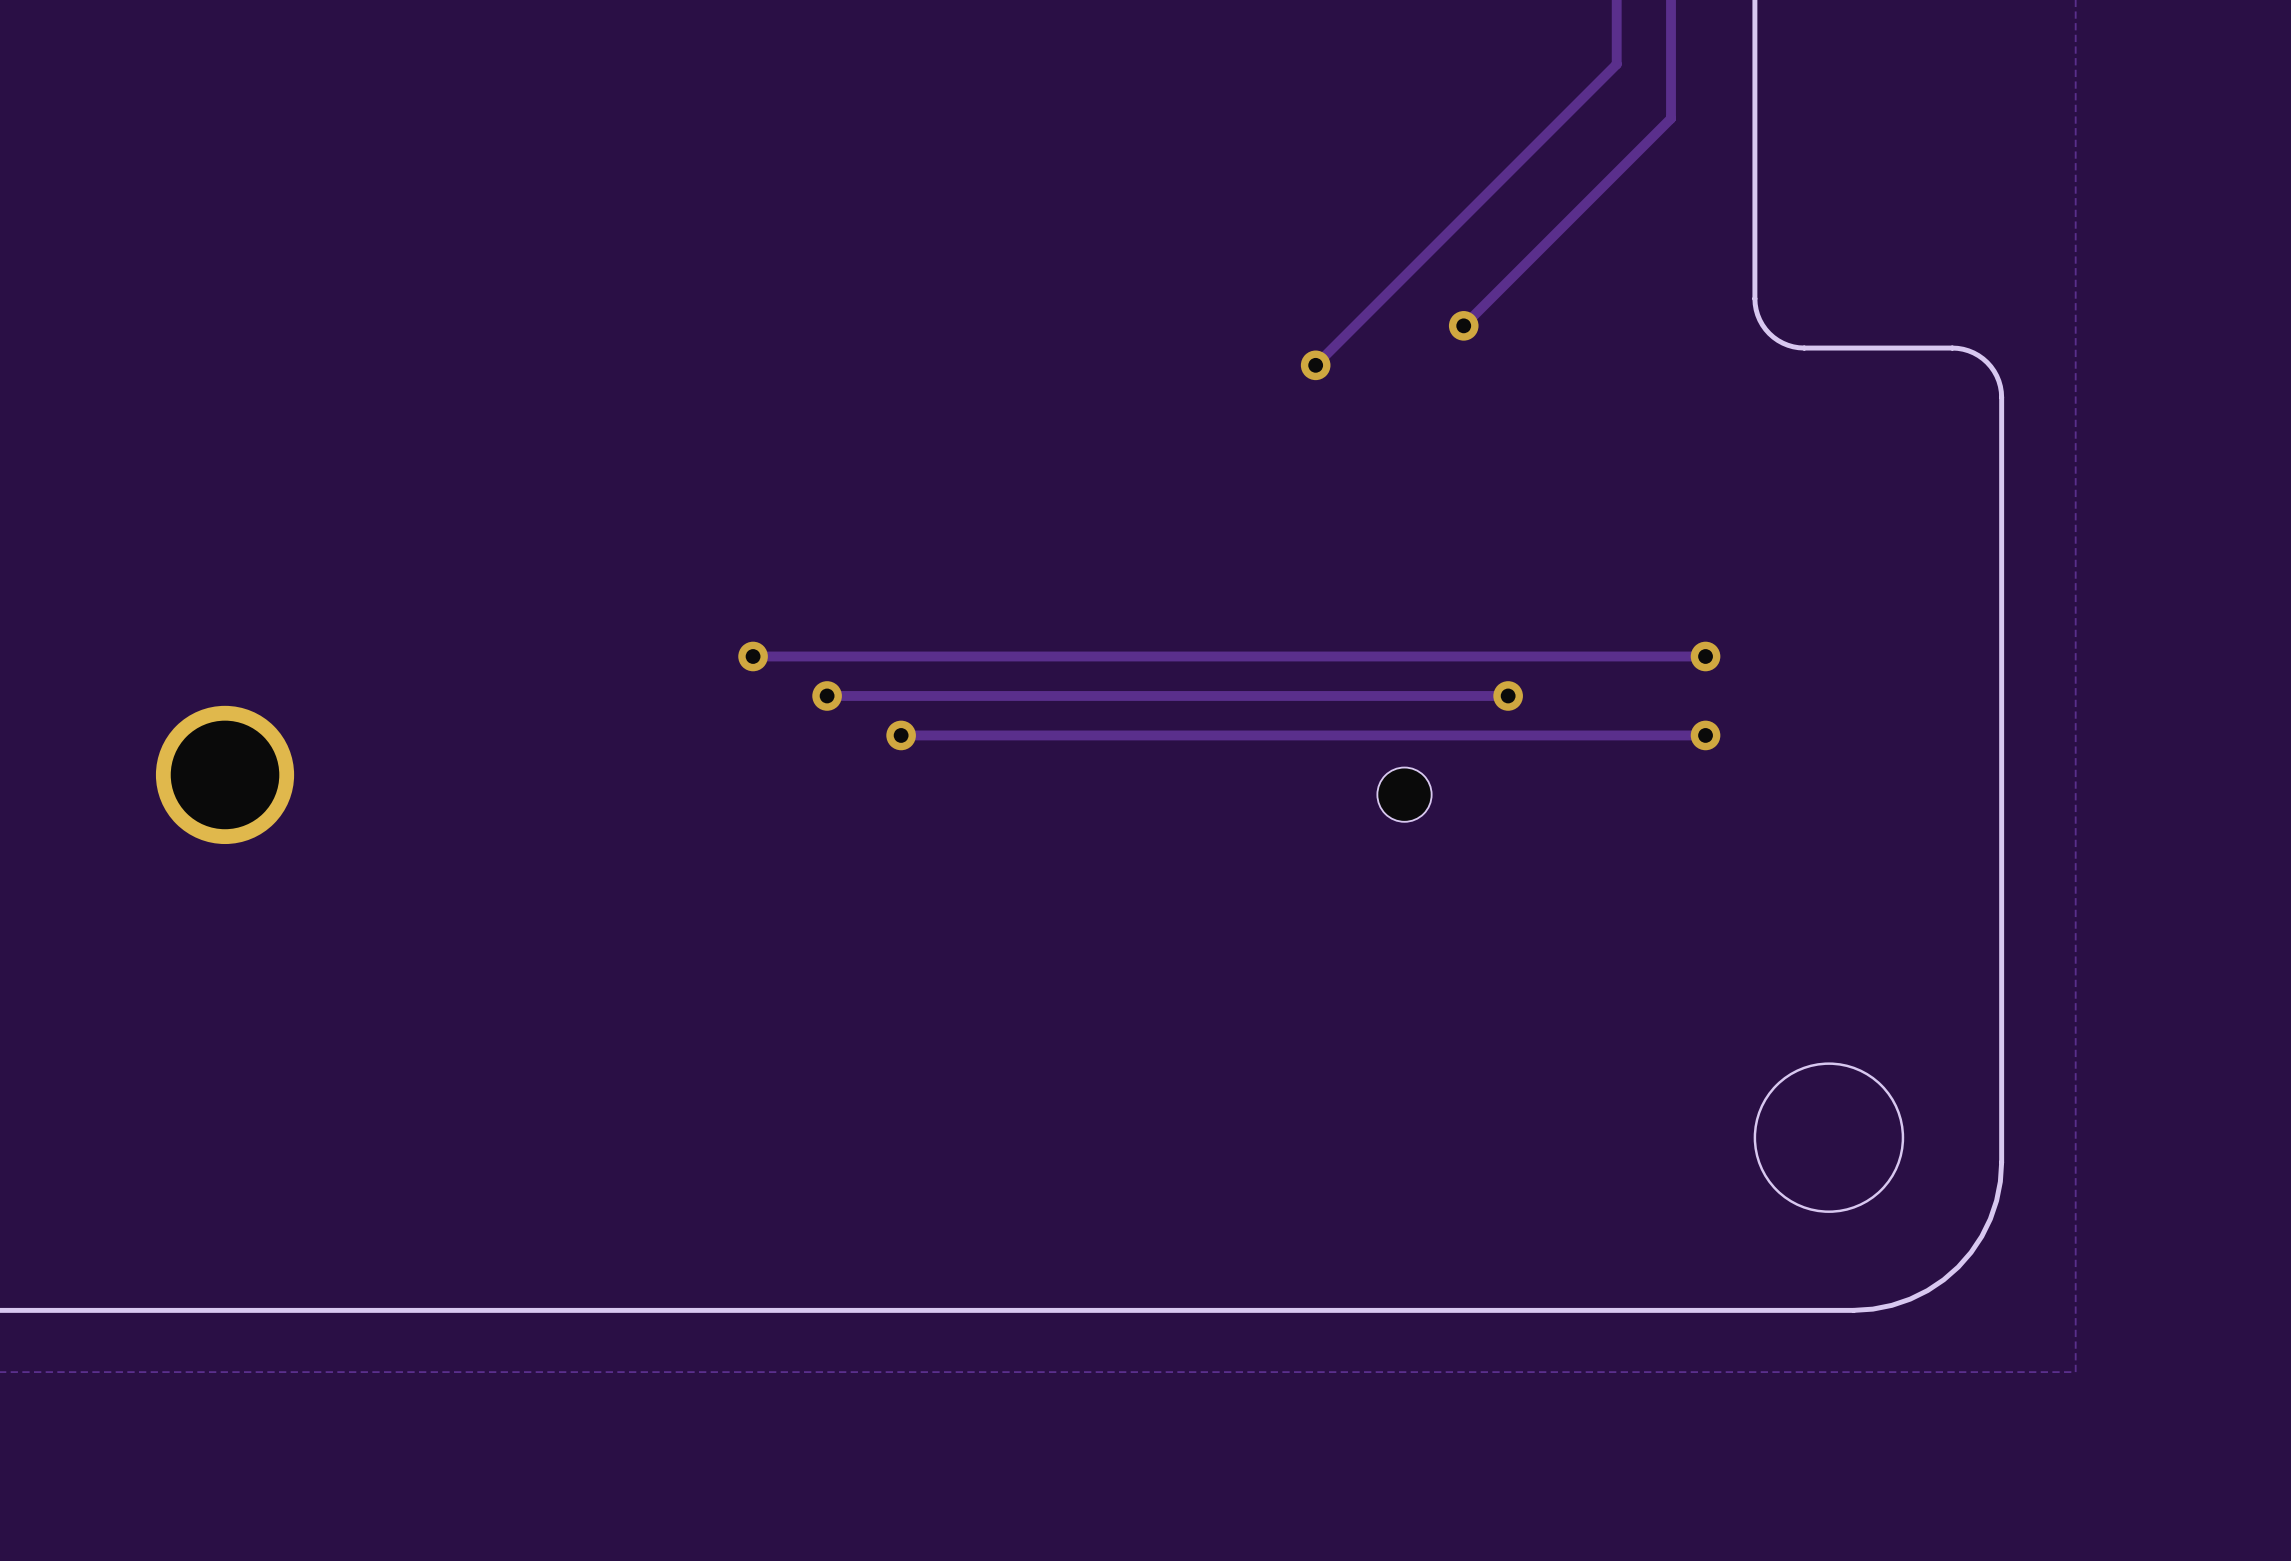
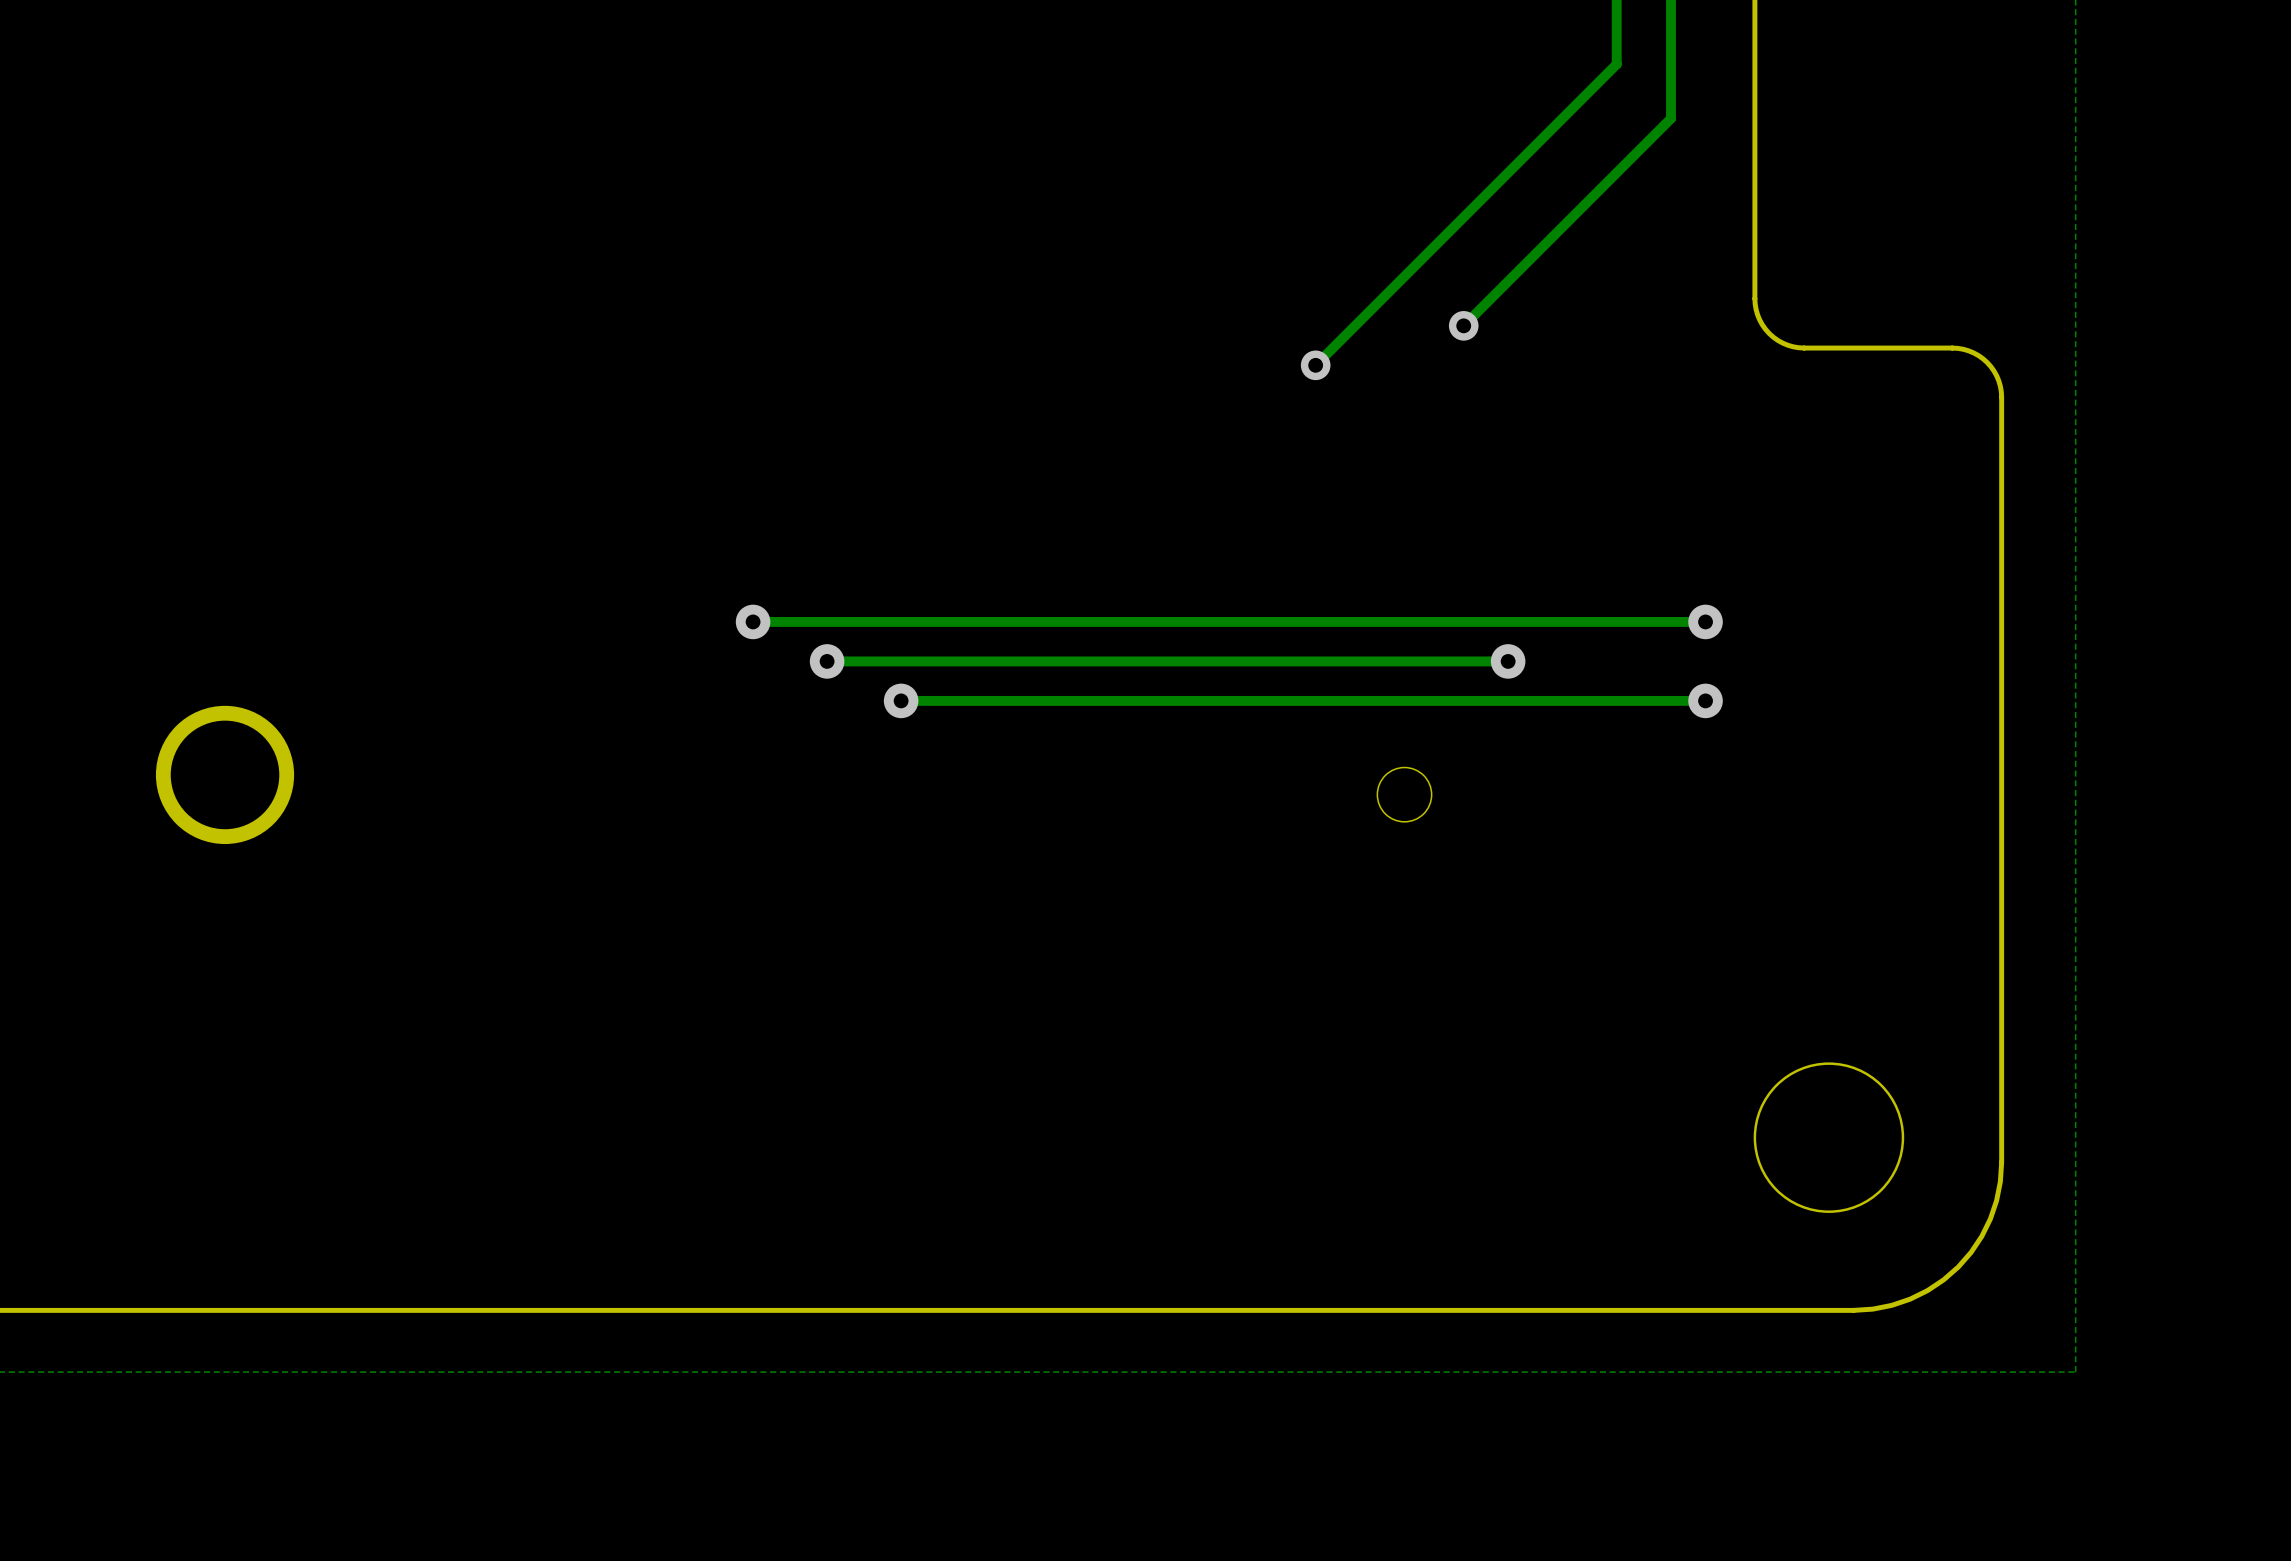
via: none -> (753, 621)
via: none -> (1705, 621)
via: (753, 656) -> none
track: (1705, 656) (753, 656) -> (1705, 621) (753, 621)
via: (1705, 656) -> none
via: none -> (827, 661)
via: none -> (1508, 661)
via: (827, 695) -> none
track: (1508, 695) (827, 695) -> (1508, 661) (827, 661)
via: (1508, 695) -> none
via: none -> (901, 700)
via: none -> (1705, 700)
via: (901, 735) -> none
track: (1705, 735) (901, 735) -> (1705, 700) (901, 700)
via: (1705, 735) -> none

